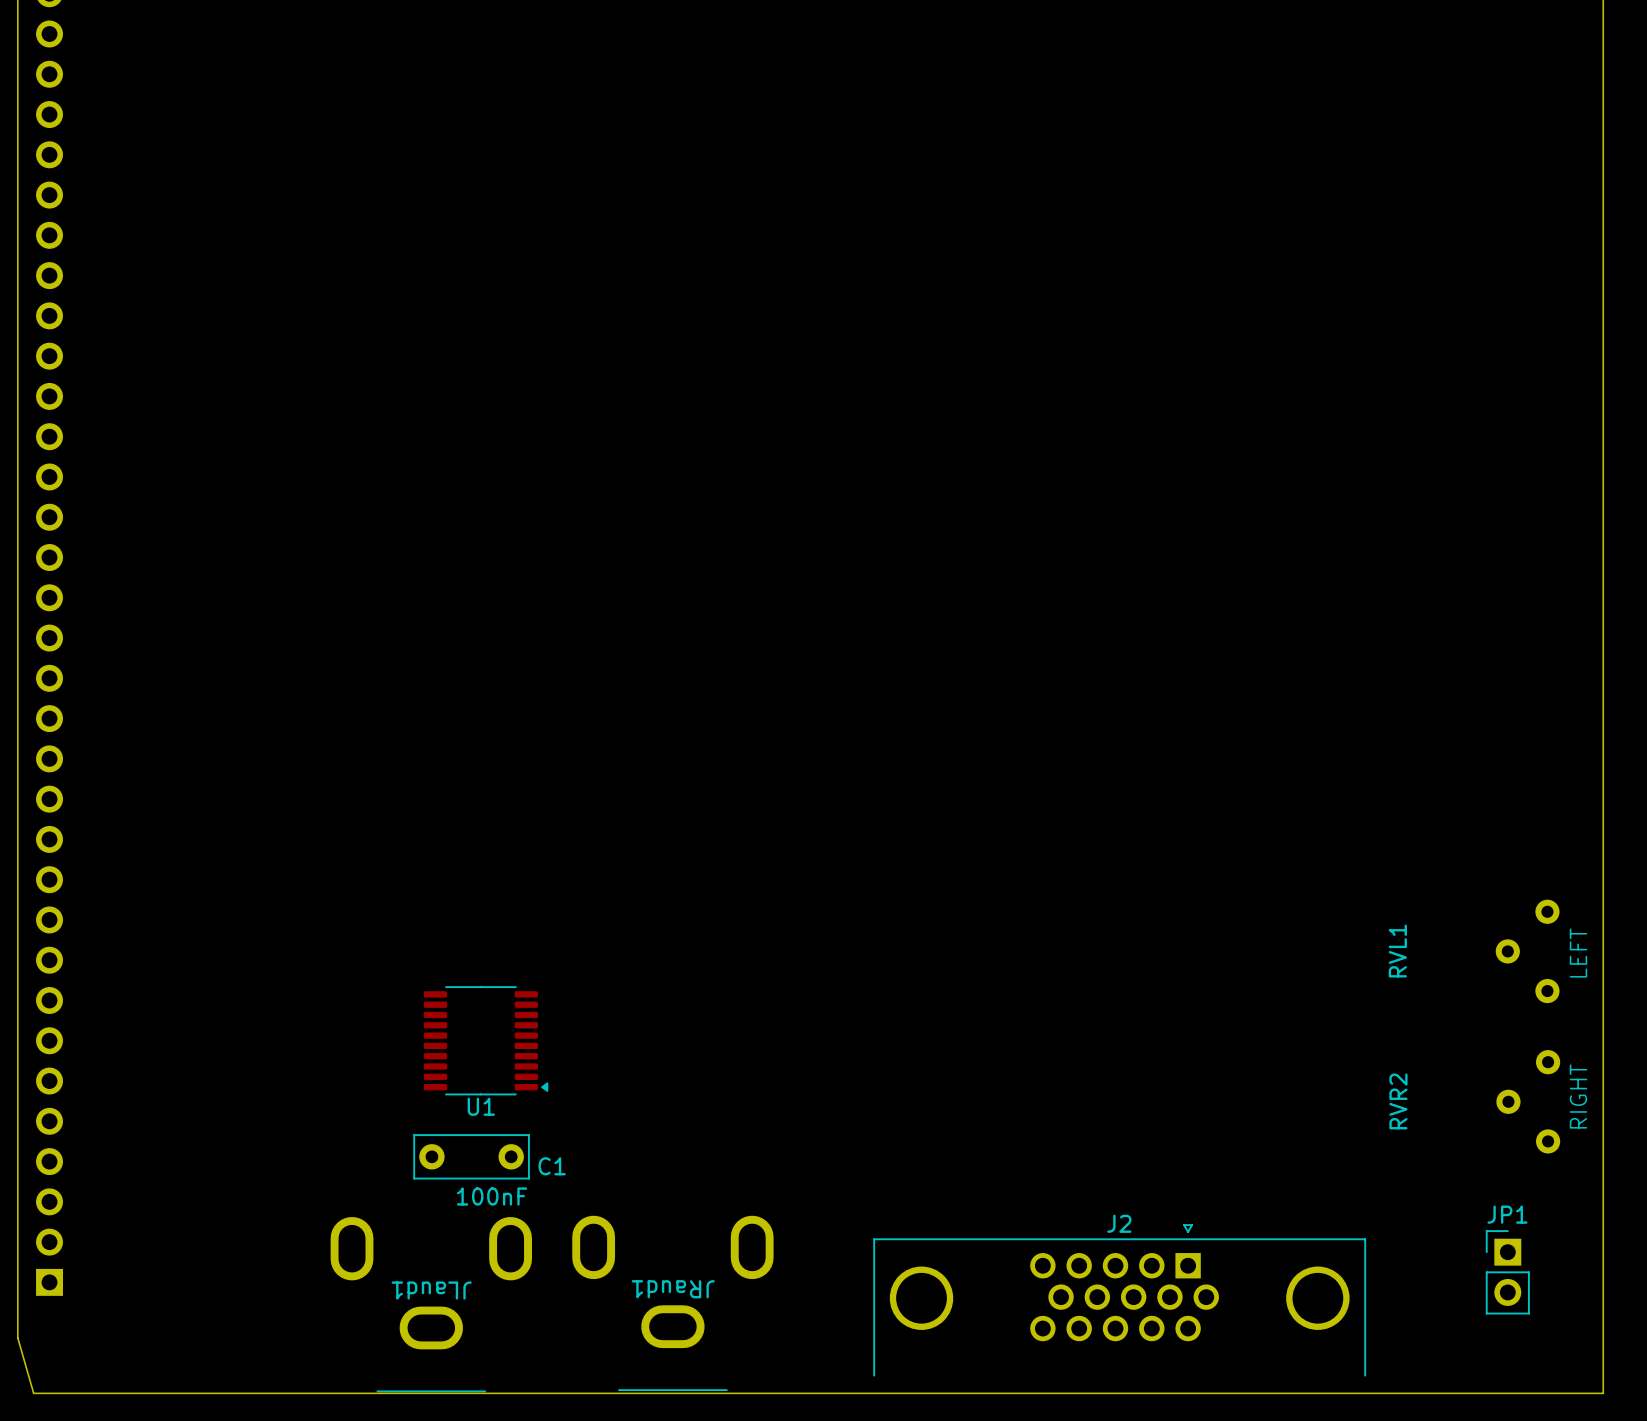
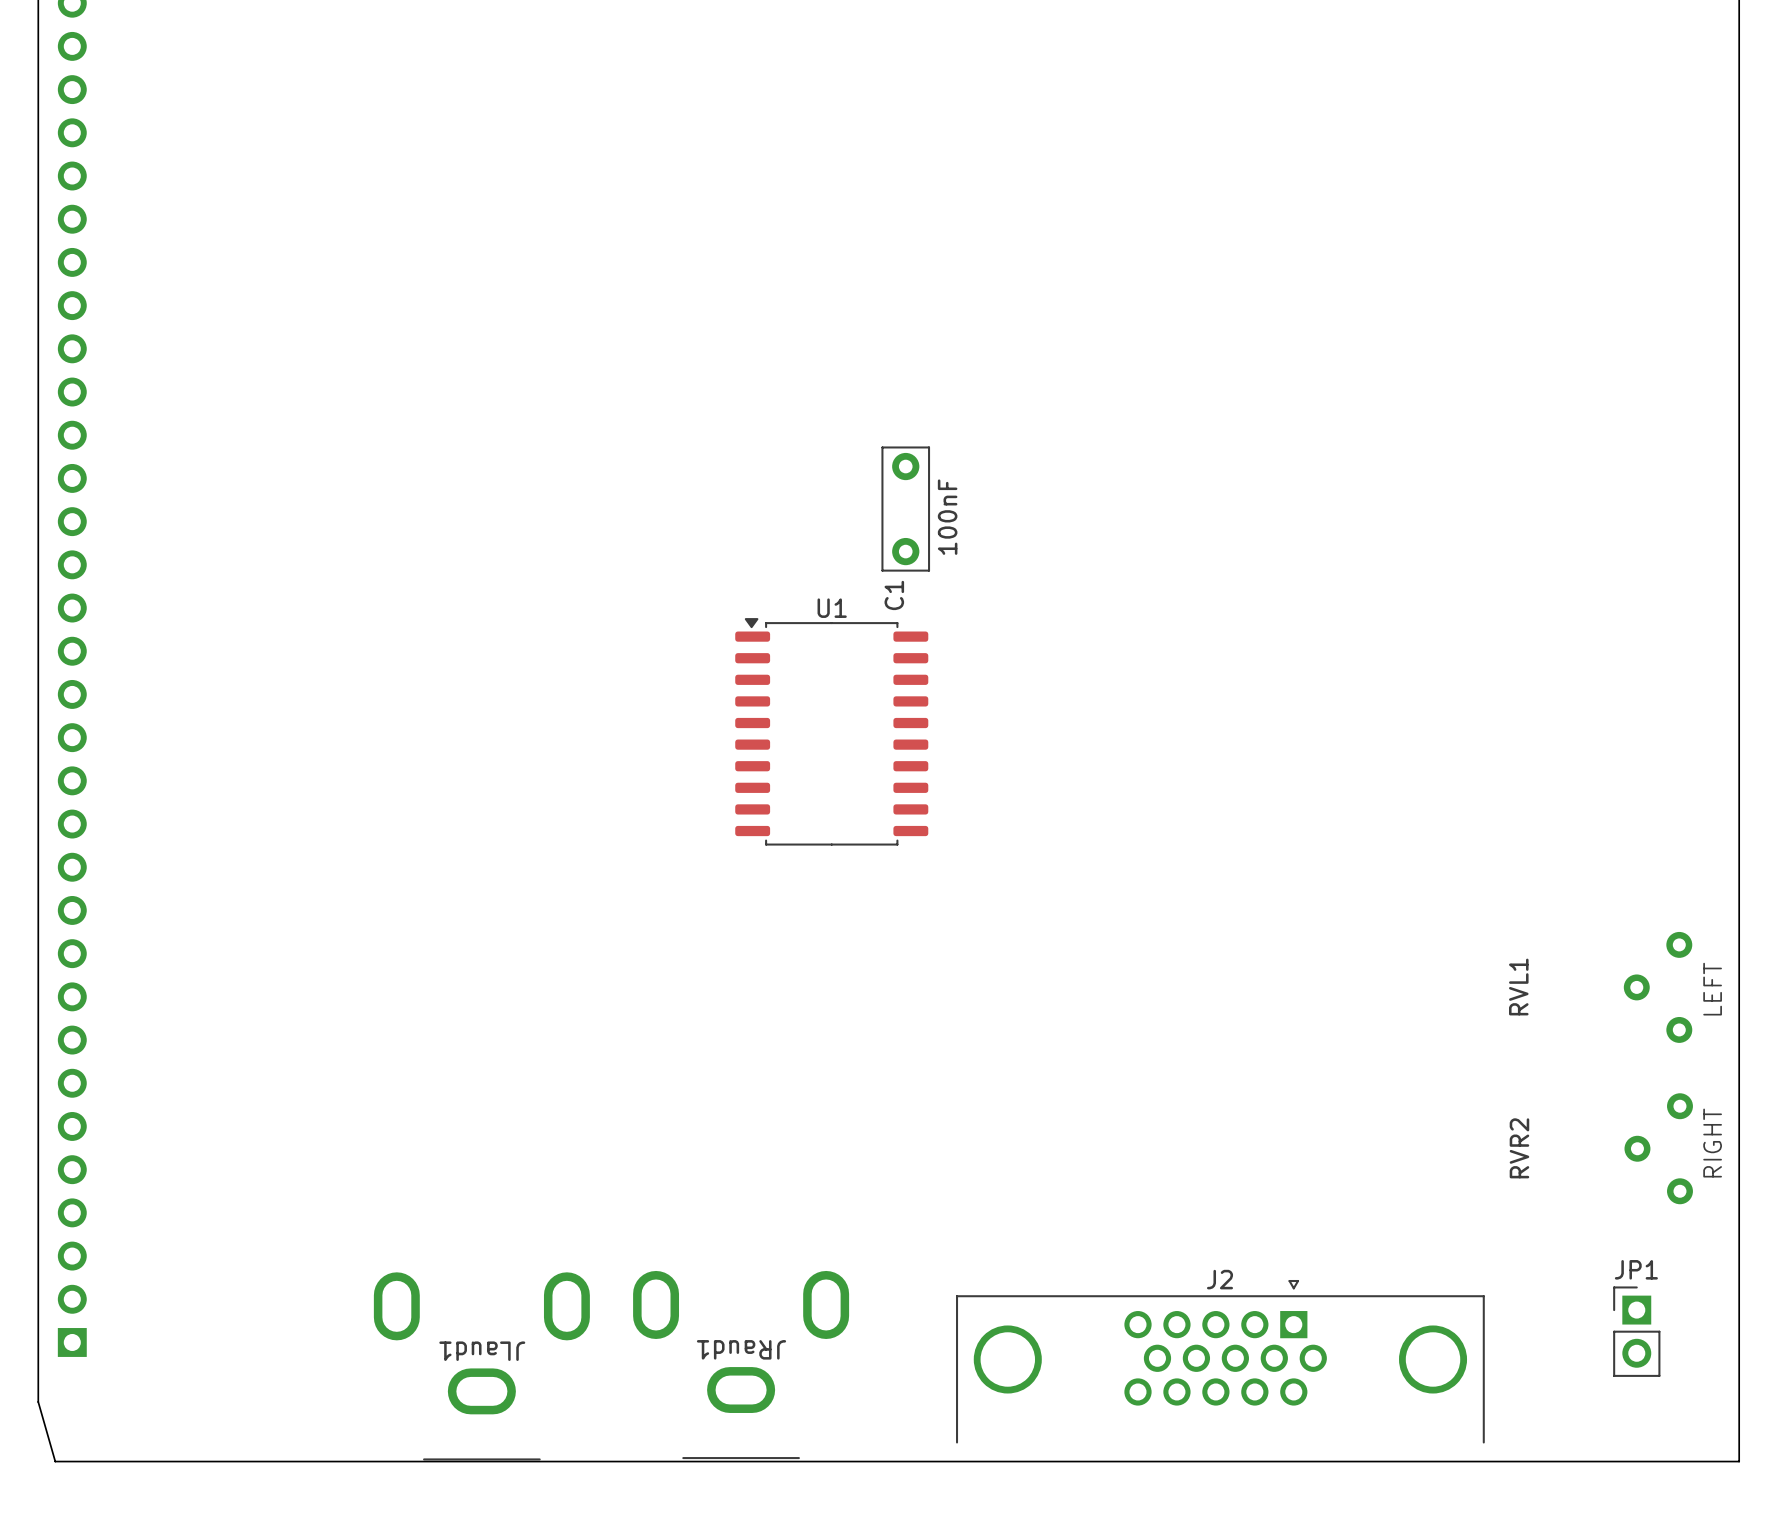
U1 footprint: [423, 986, 549, 1096] -> [735, 618, 929, 846]
U1 name position: U1 (481, 1106) -> U1 (832, 608)
C1 rotation: 0° (471, 1156) -> 90° clockwise (905, 509)
C1 position: (471, 1156) -> (905, 509)
C1 value position: 100nF (492, 1196) -> 100nF (947, 517)

